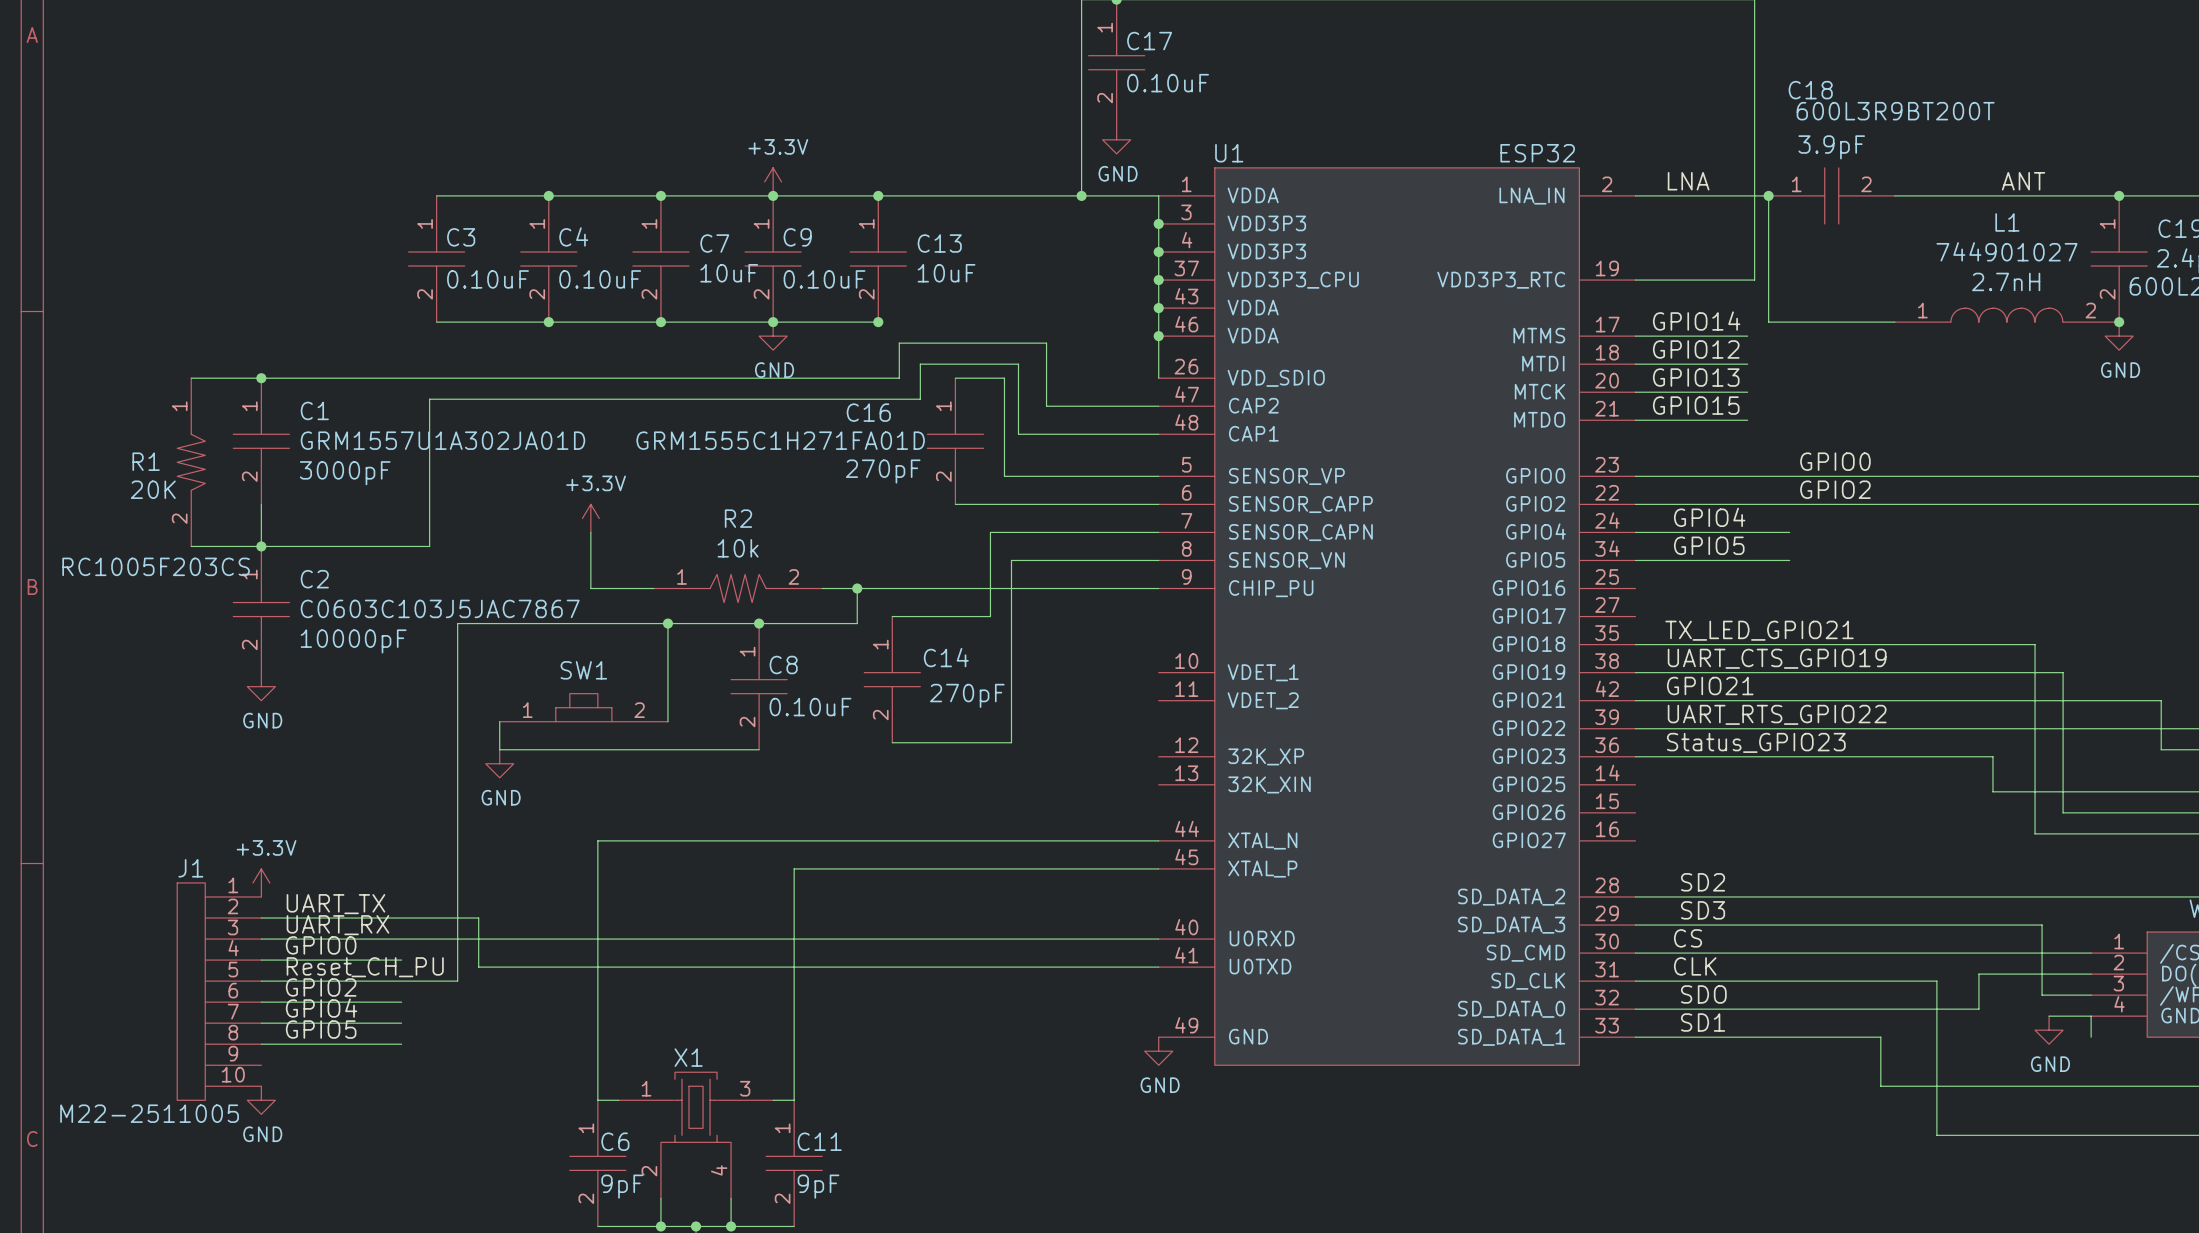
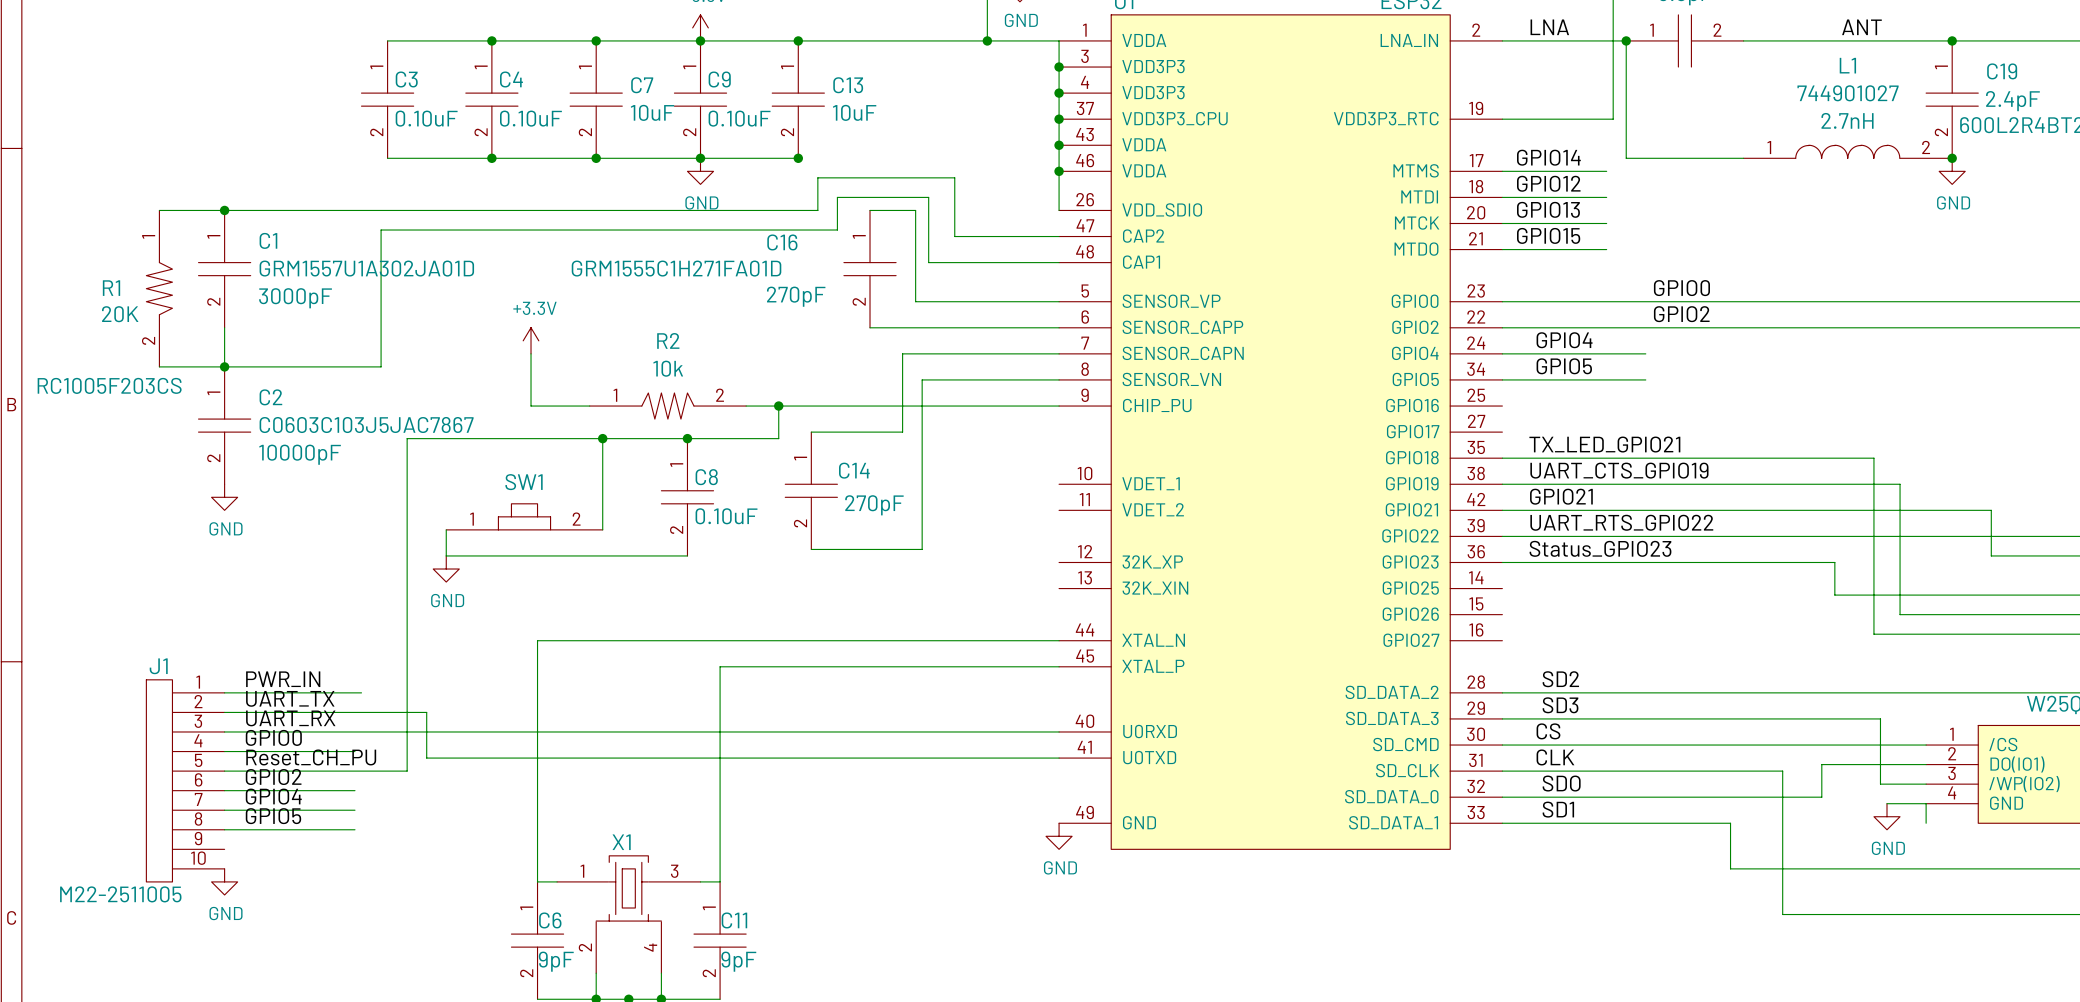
power symbol: +3.3V (261, 882) -> none
label: none -> PWR_IN (283, 679)
wire: none -> (224, 692) (361, 692)

